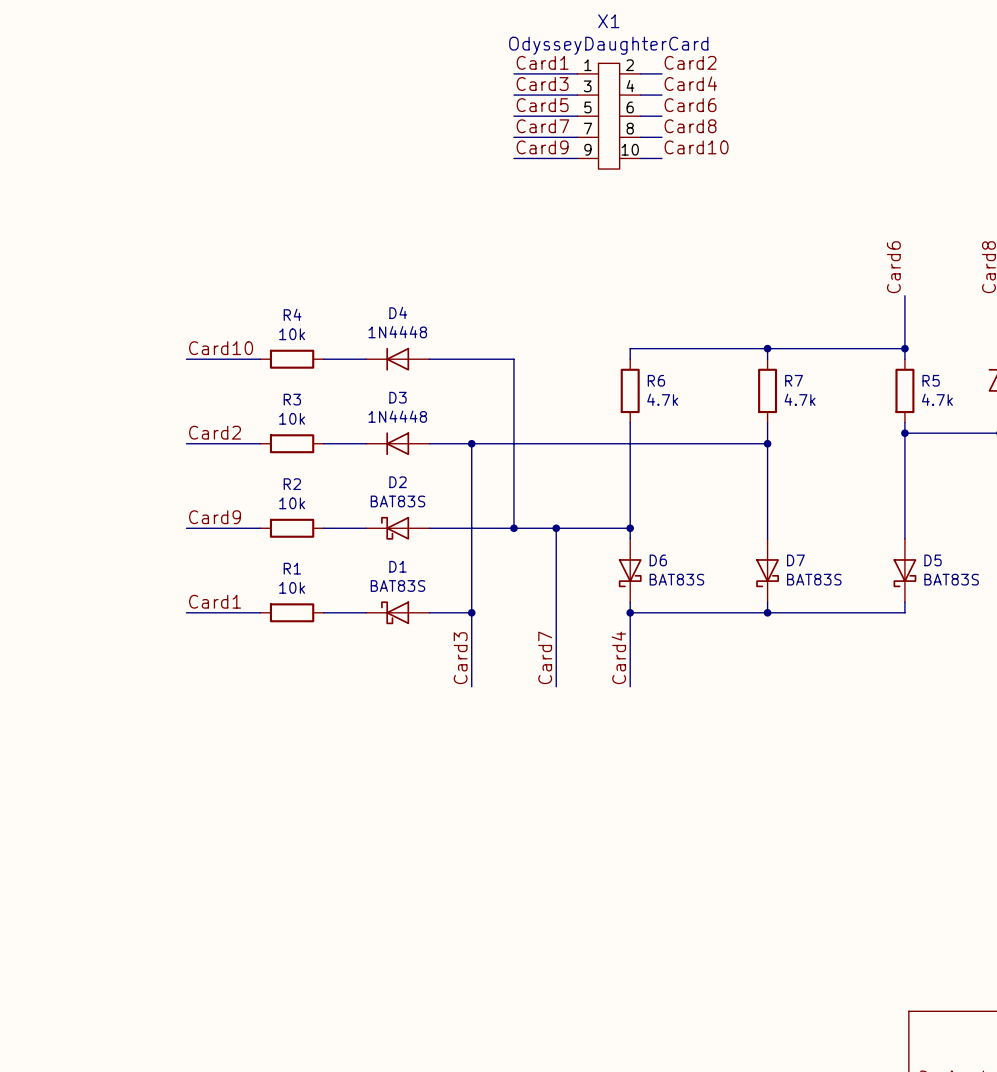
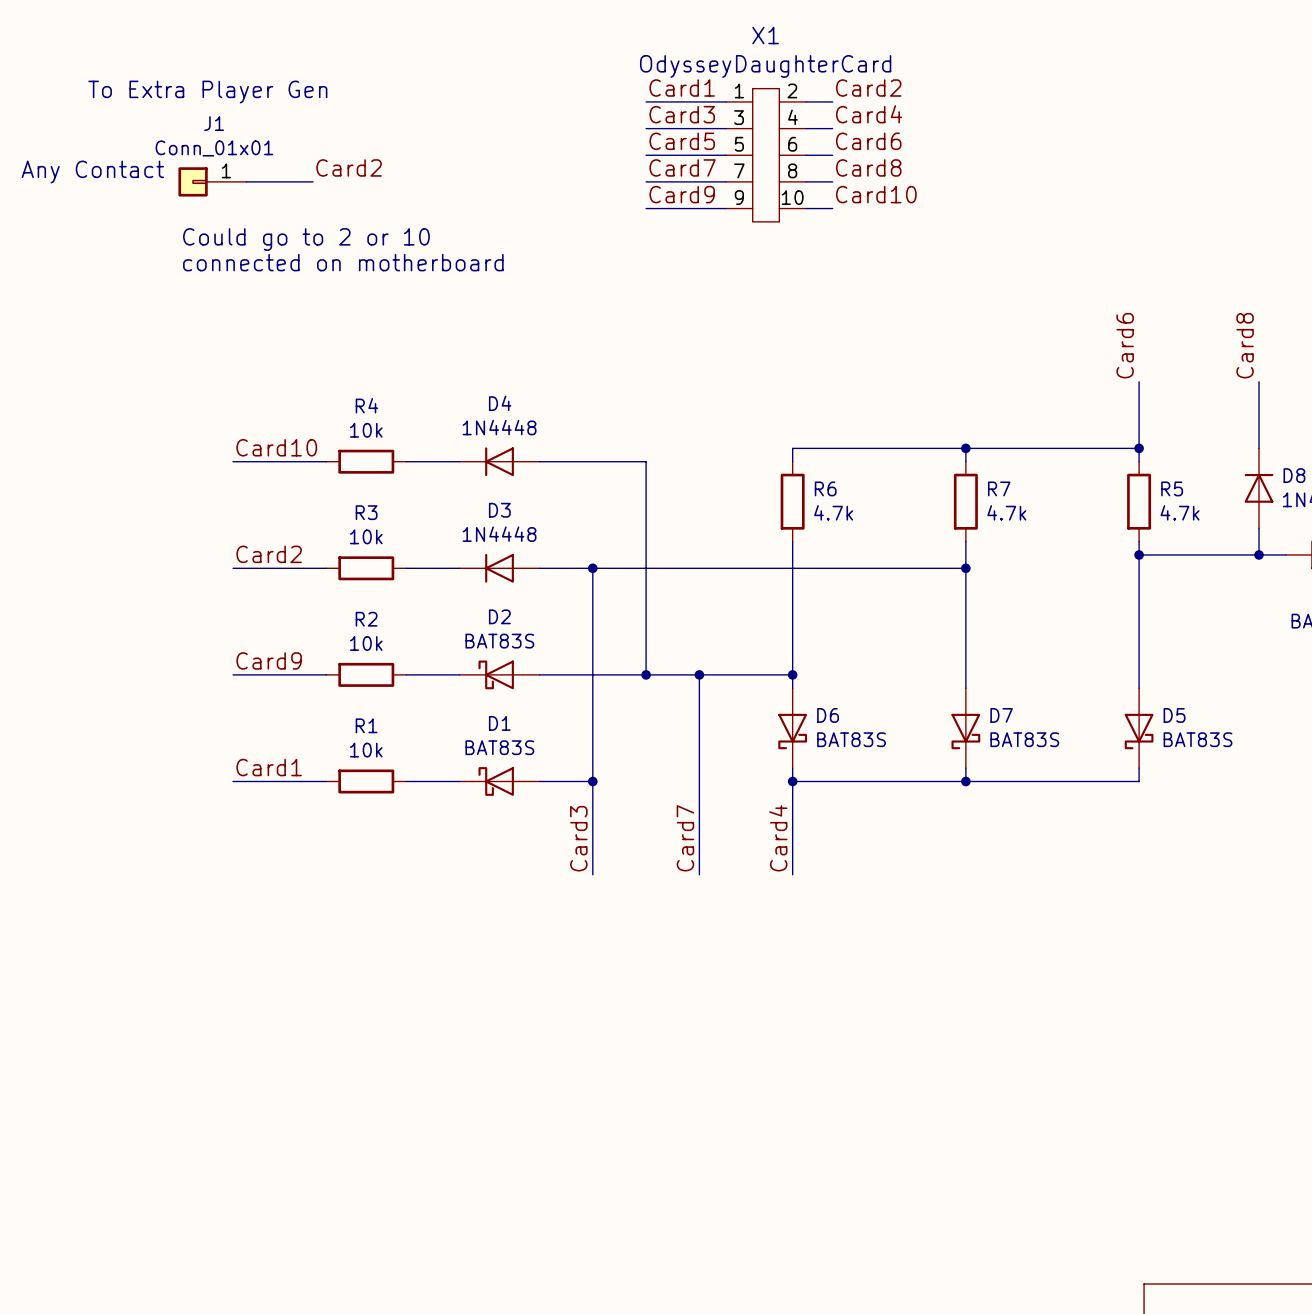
text: none -> To Extra Player Gen (207, 92)
label: none -> Card2 (349, 167)
text: none -> Any Contact (92, 172)
J1: none -> Conn_01x01 (212, 181)
wire: none -> (246, 181) (312, 181)
text: none -> Could go to 2 or 10 (306, 239)
text: none -> connected on motherboard (343, 262)

